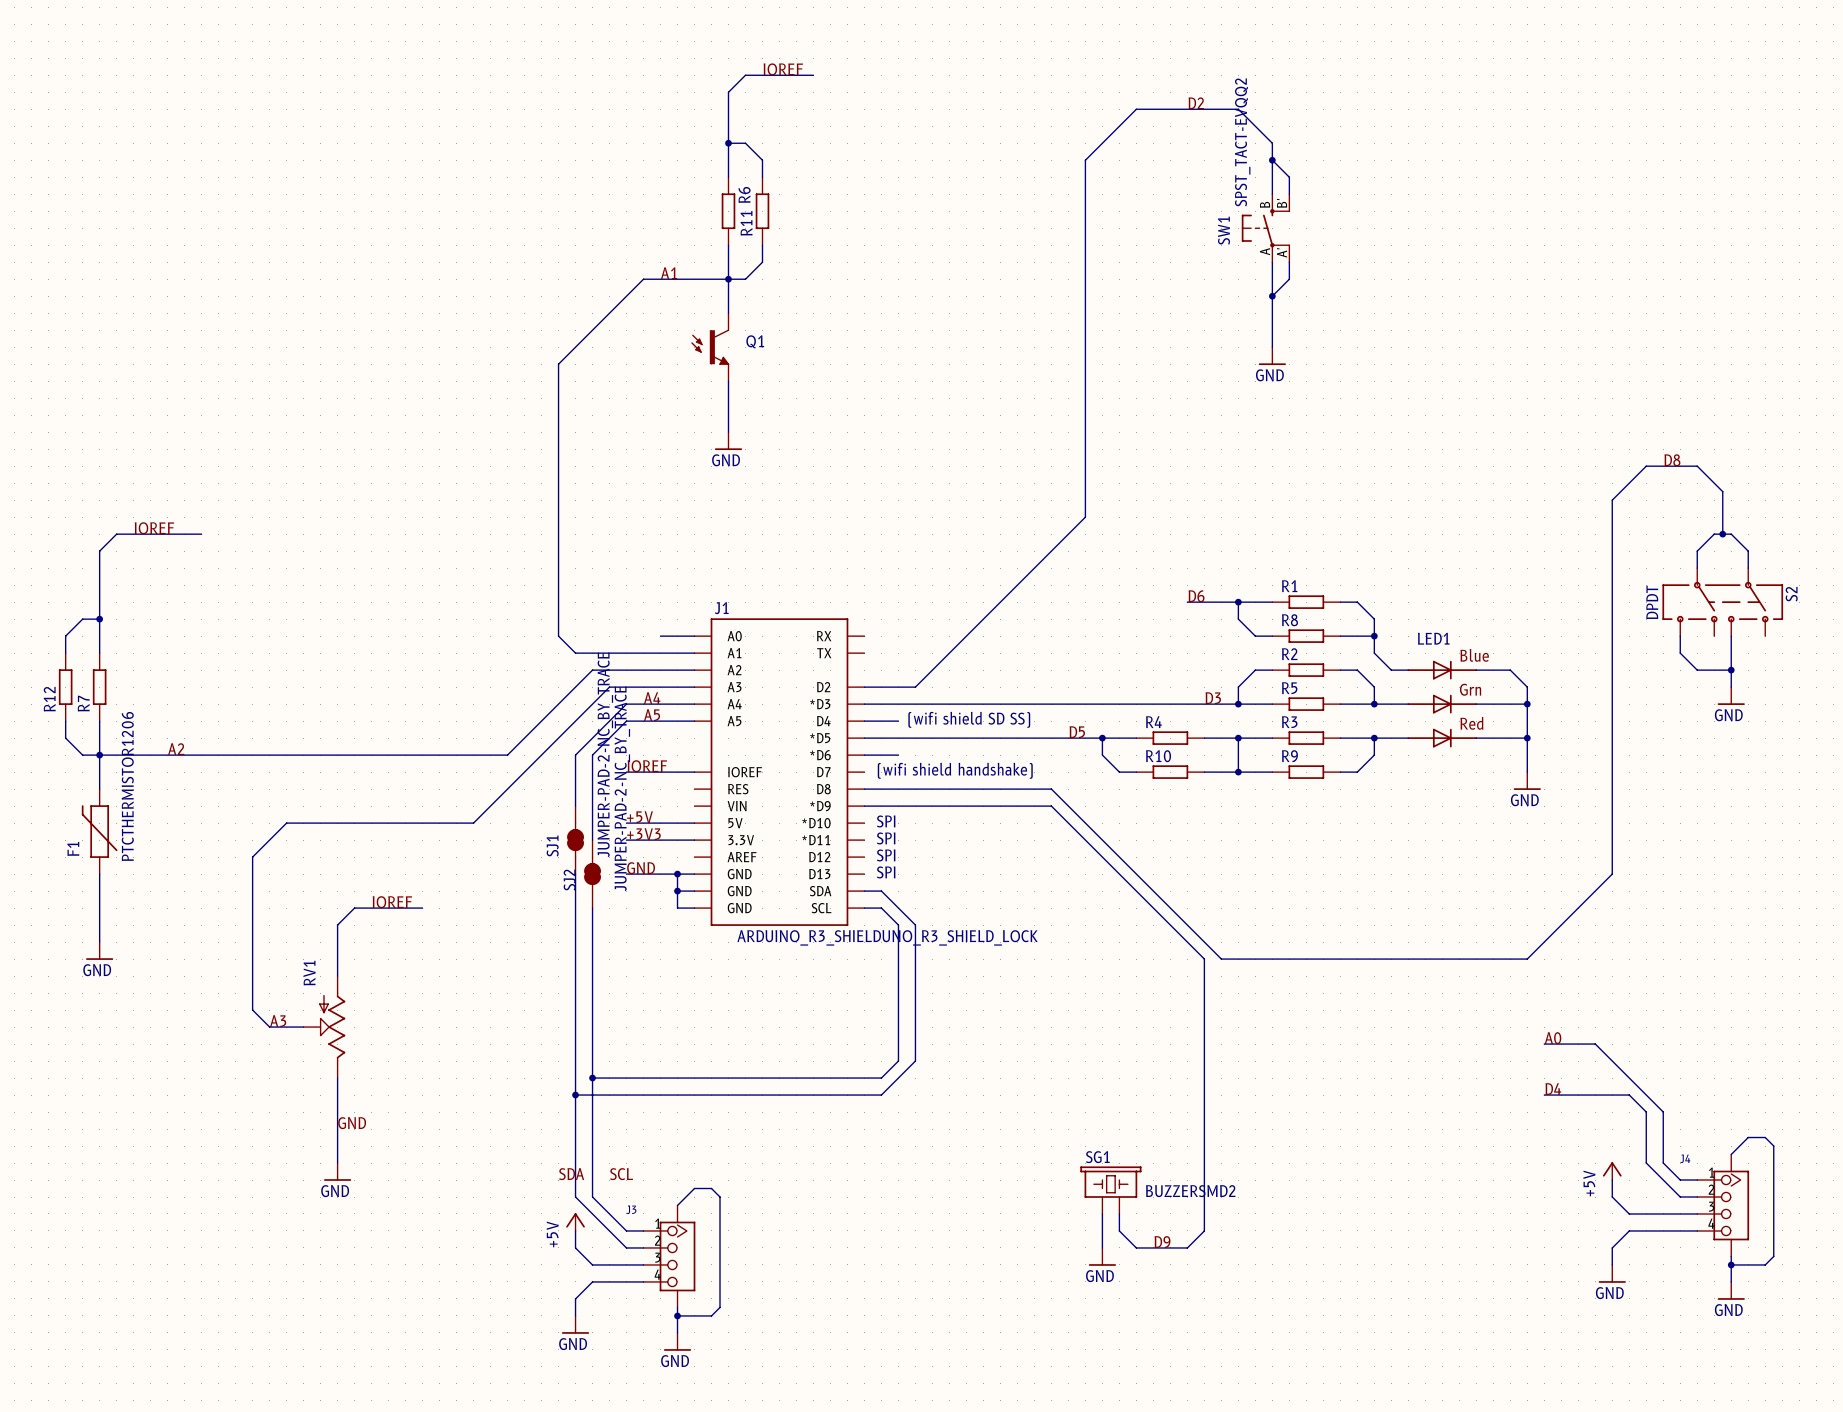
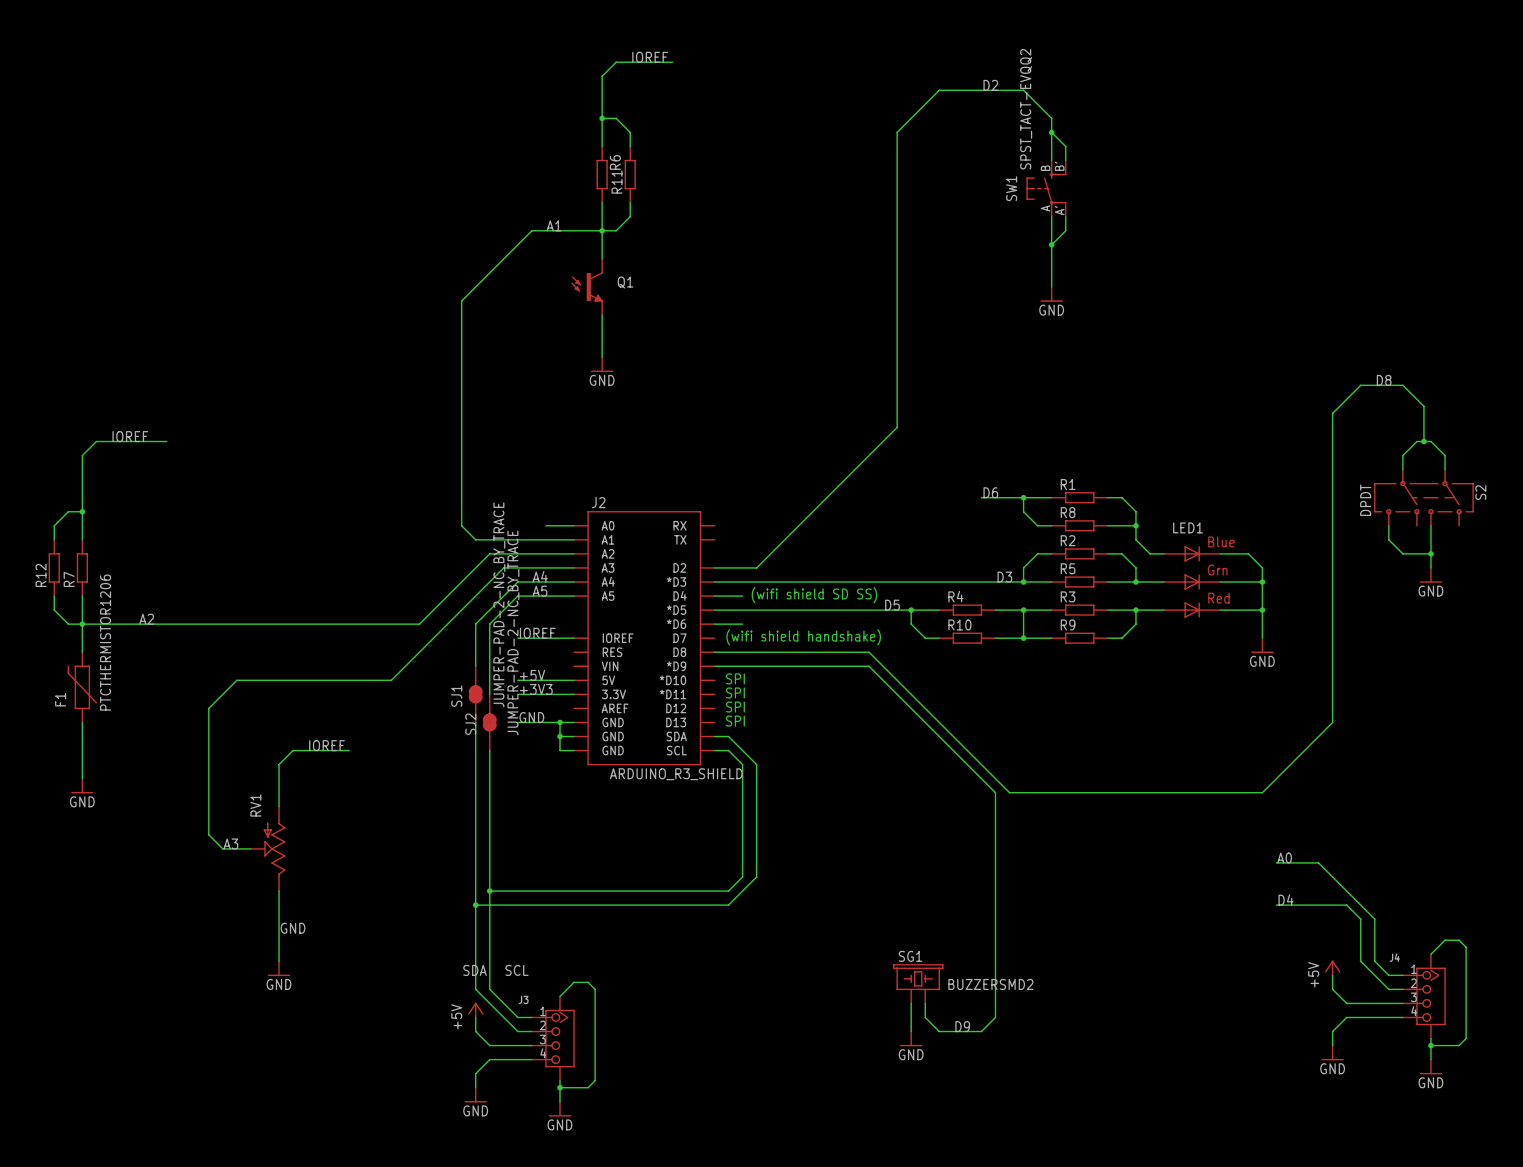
J1 name: J1 (721, 608) -> J2 (598, 502)
J1 value: ARDUINO_R3_SHIELDUNO_R3_SHIELD_LOCK (887, 937) -> ARDUINO_R3_SHIELD (676, 774)

